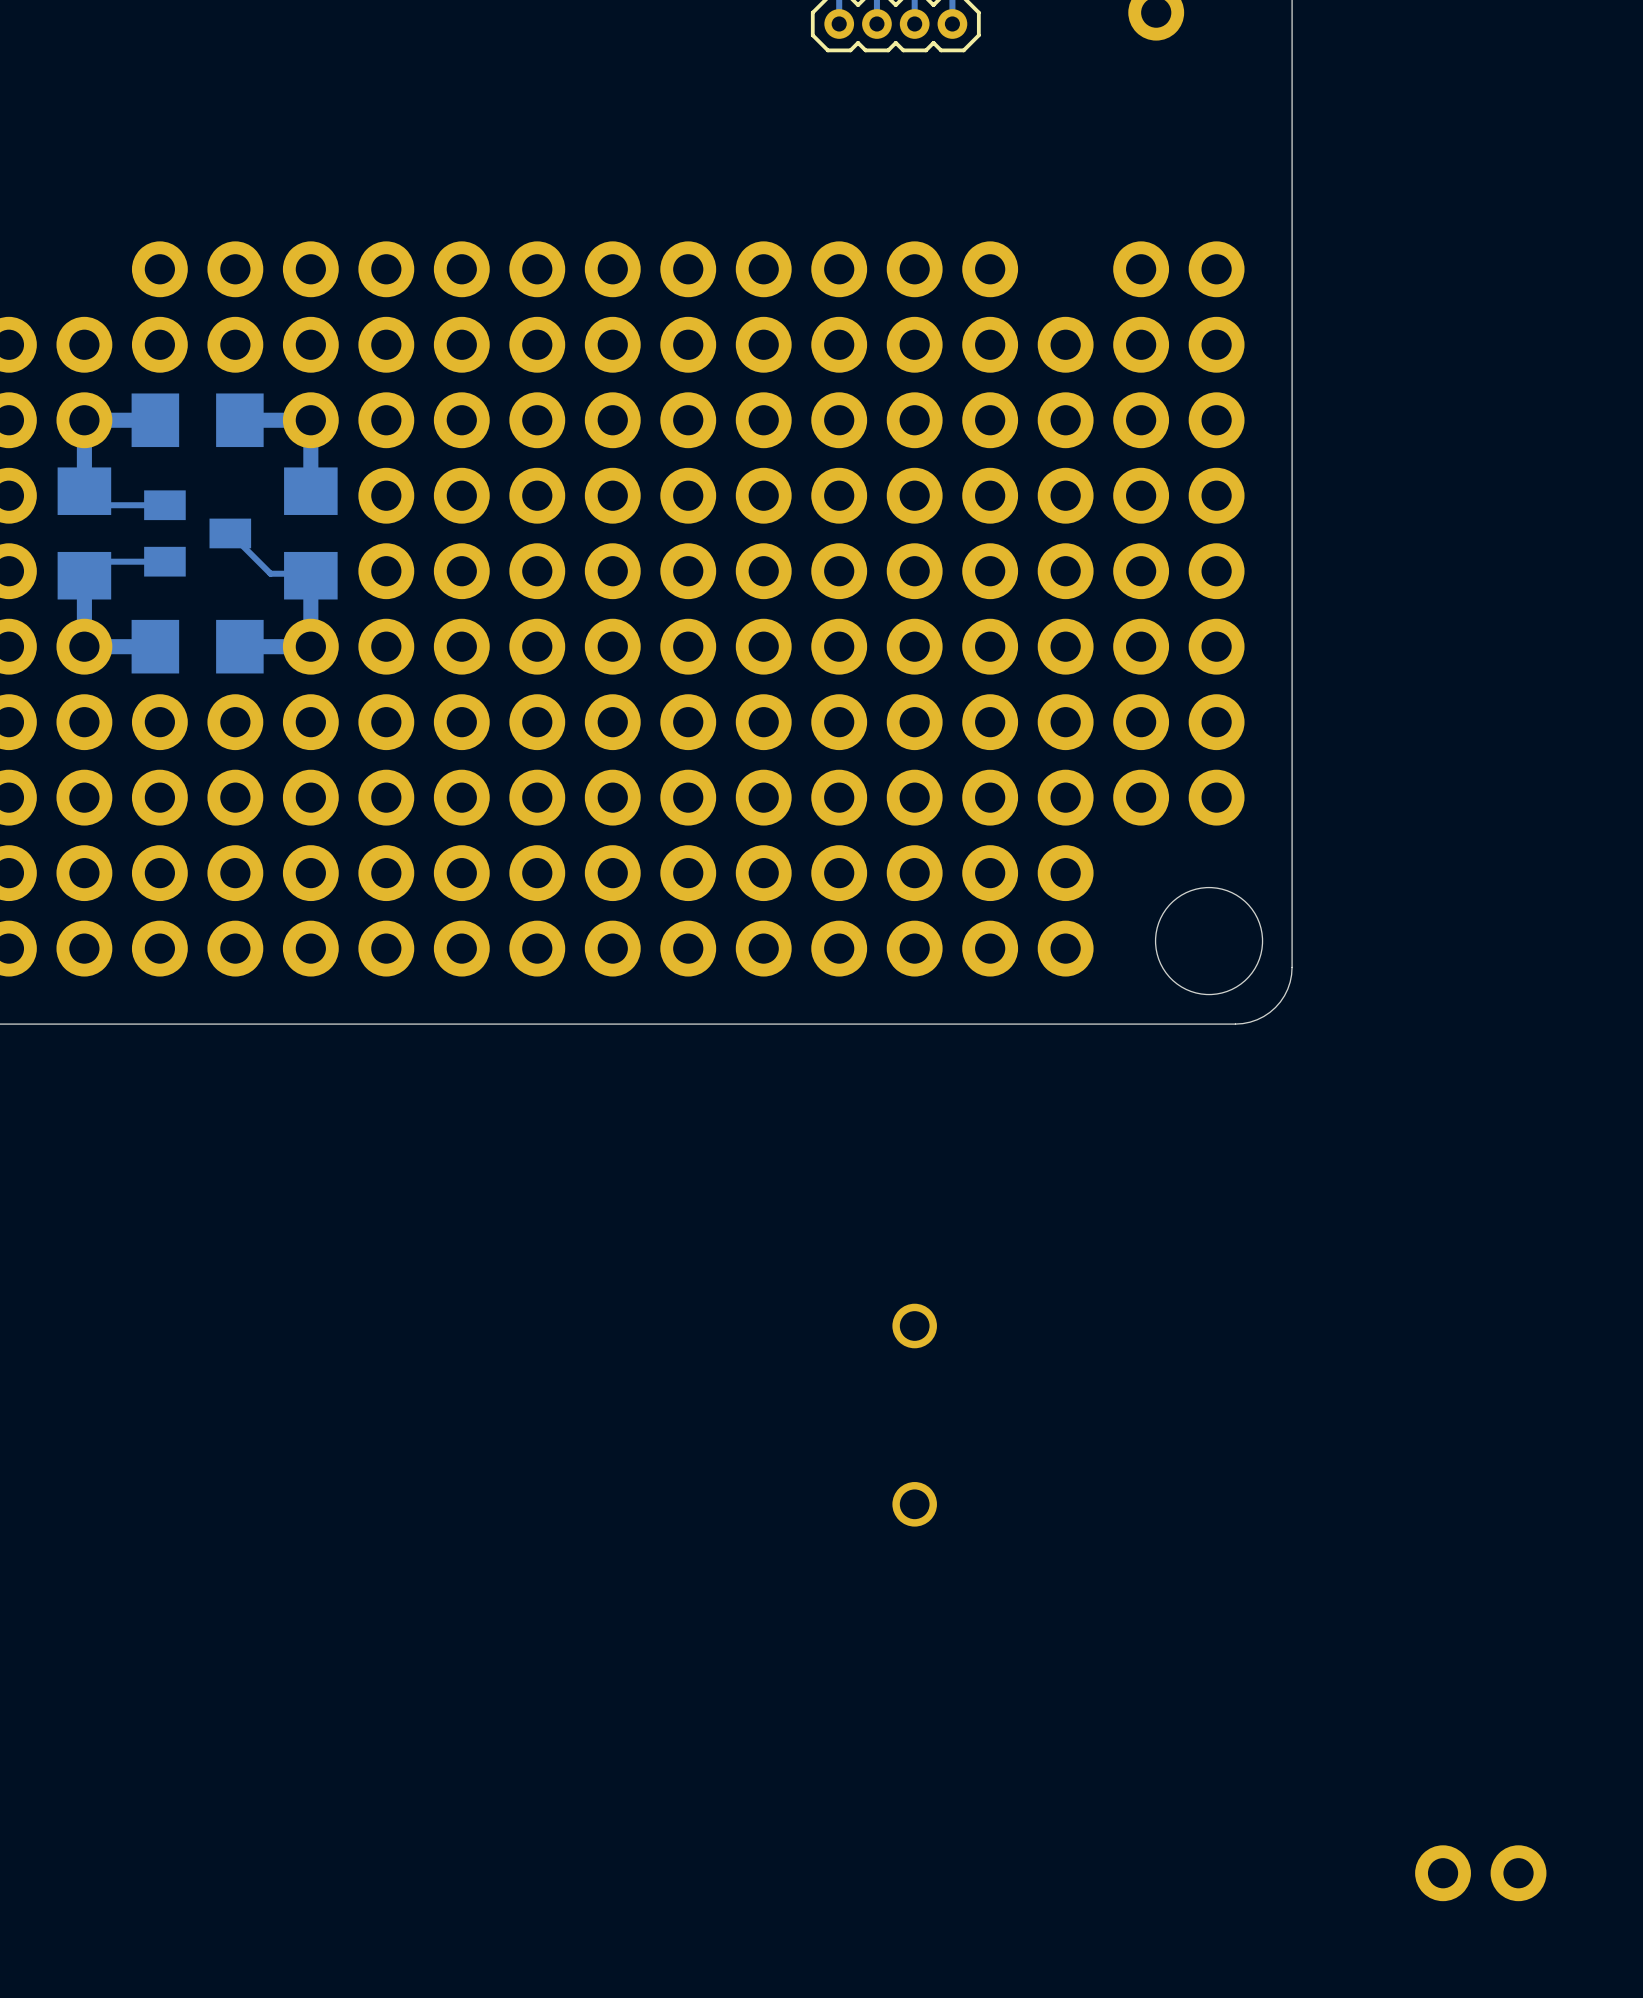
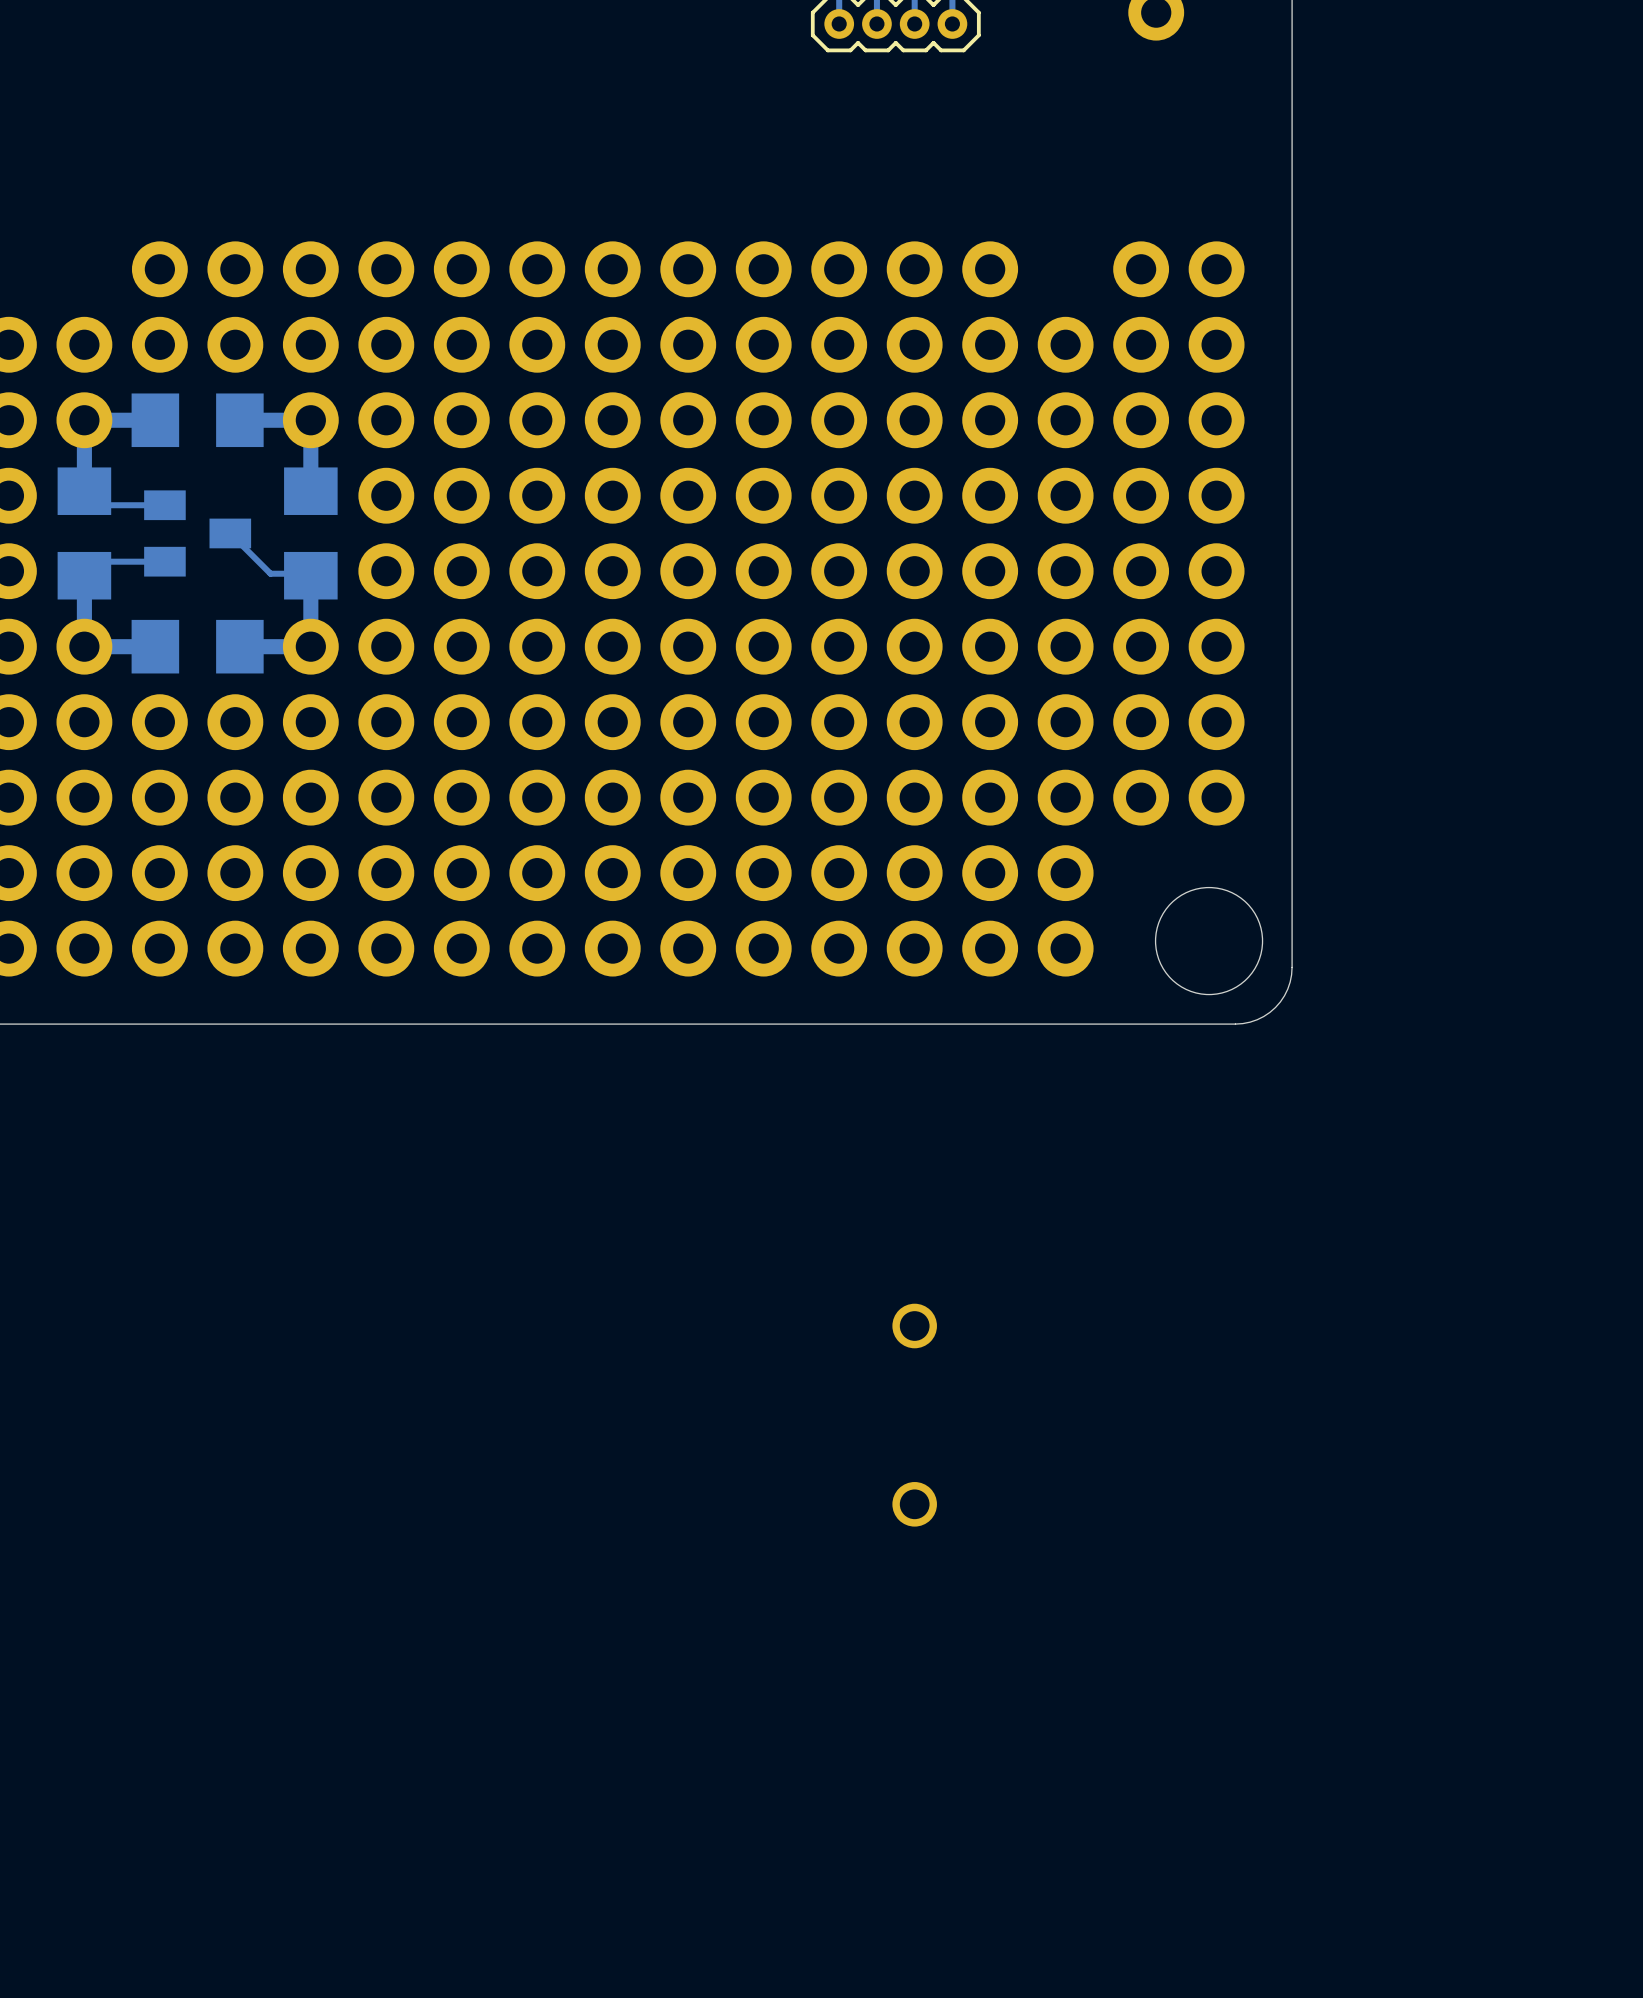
part: (1480, 1873) -> none

